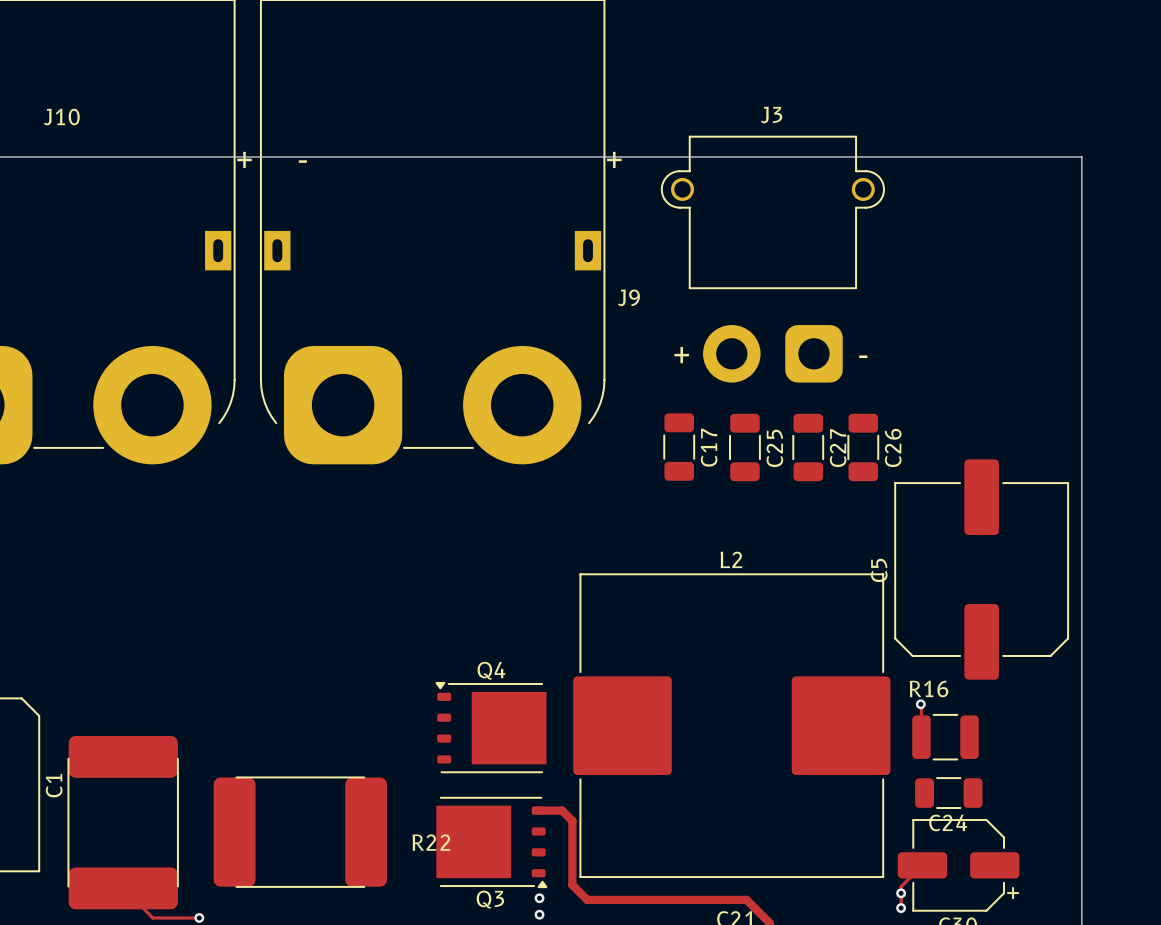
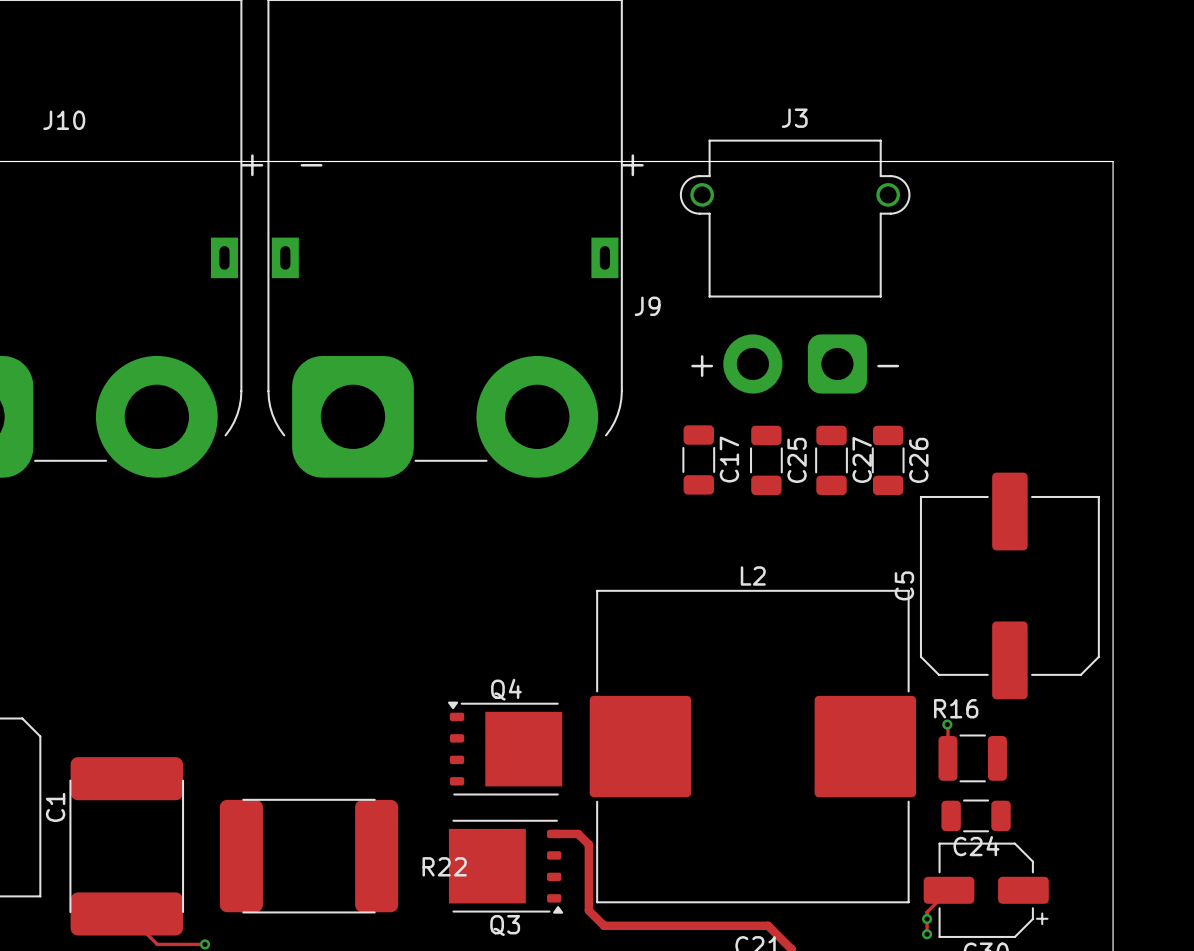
via: (539, 898) -> none
via: (539, 914) -> none

